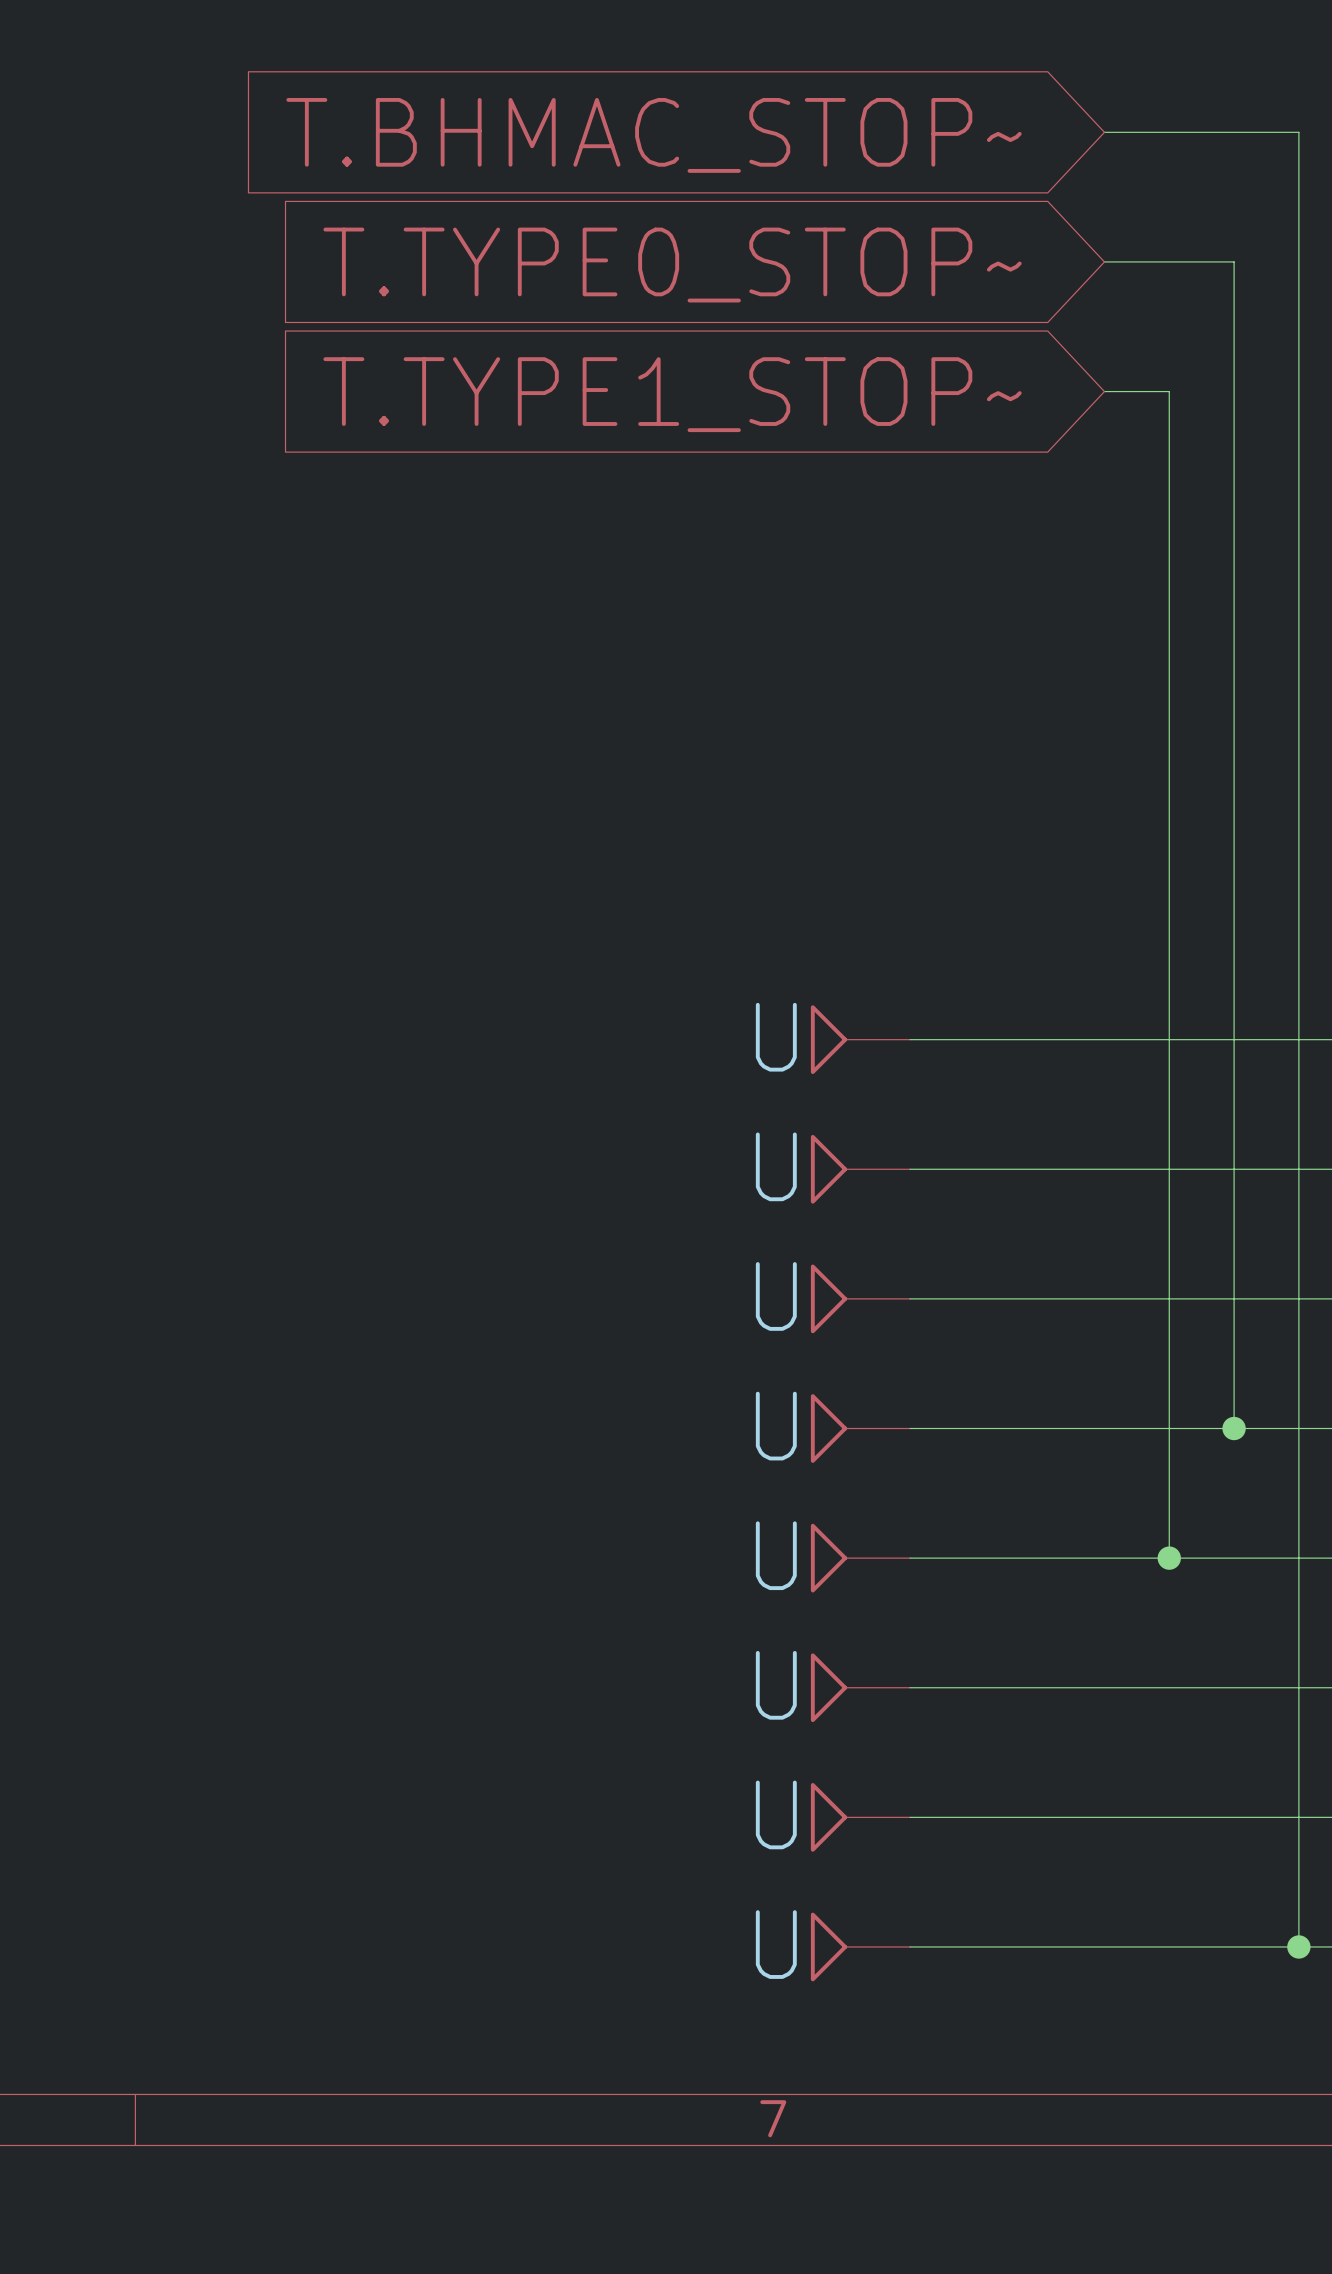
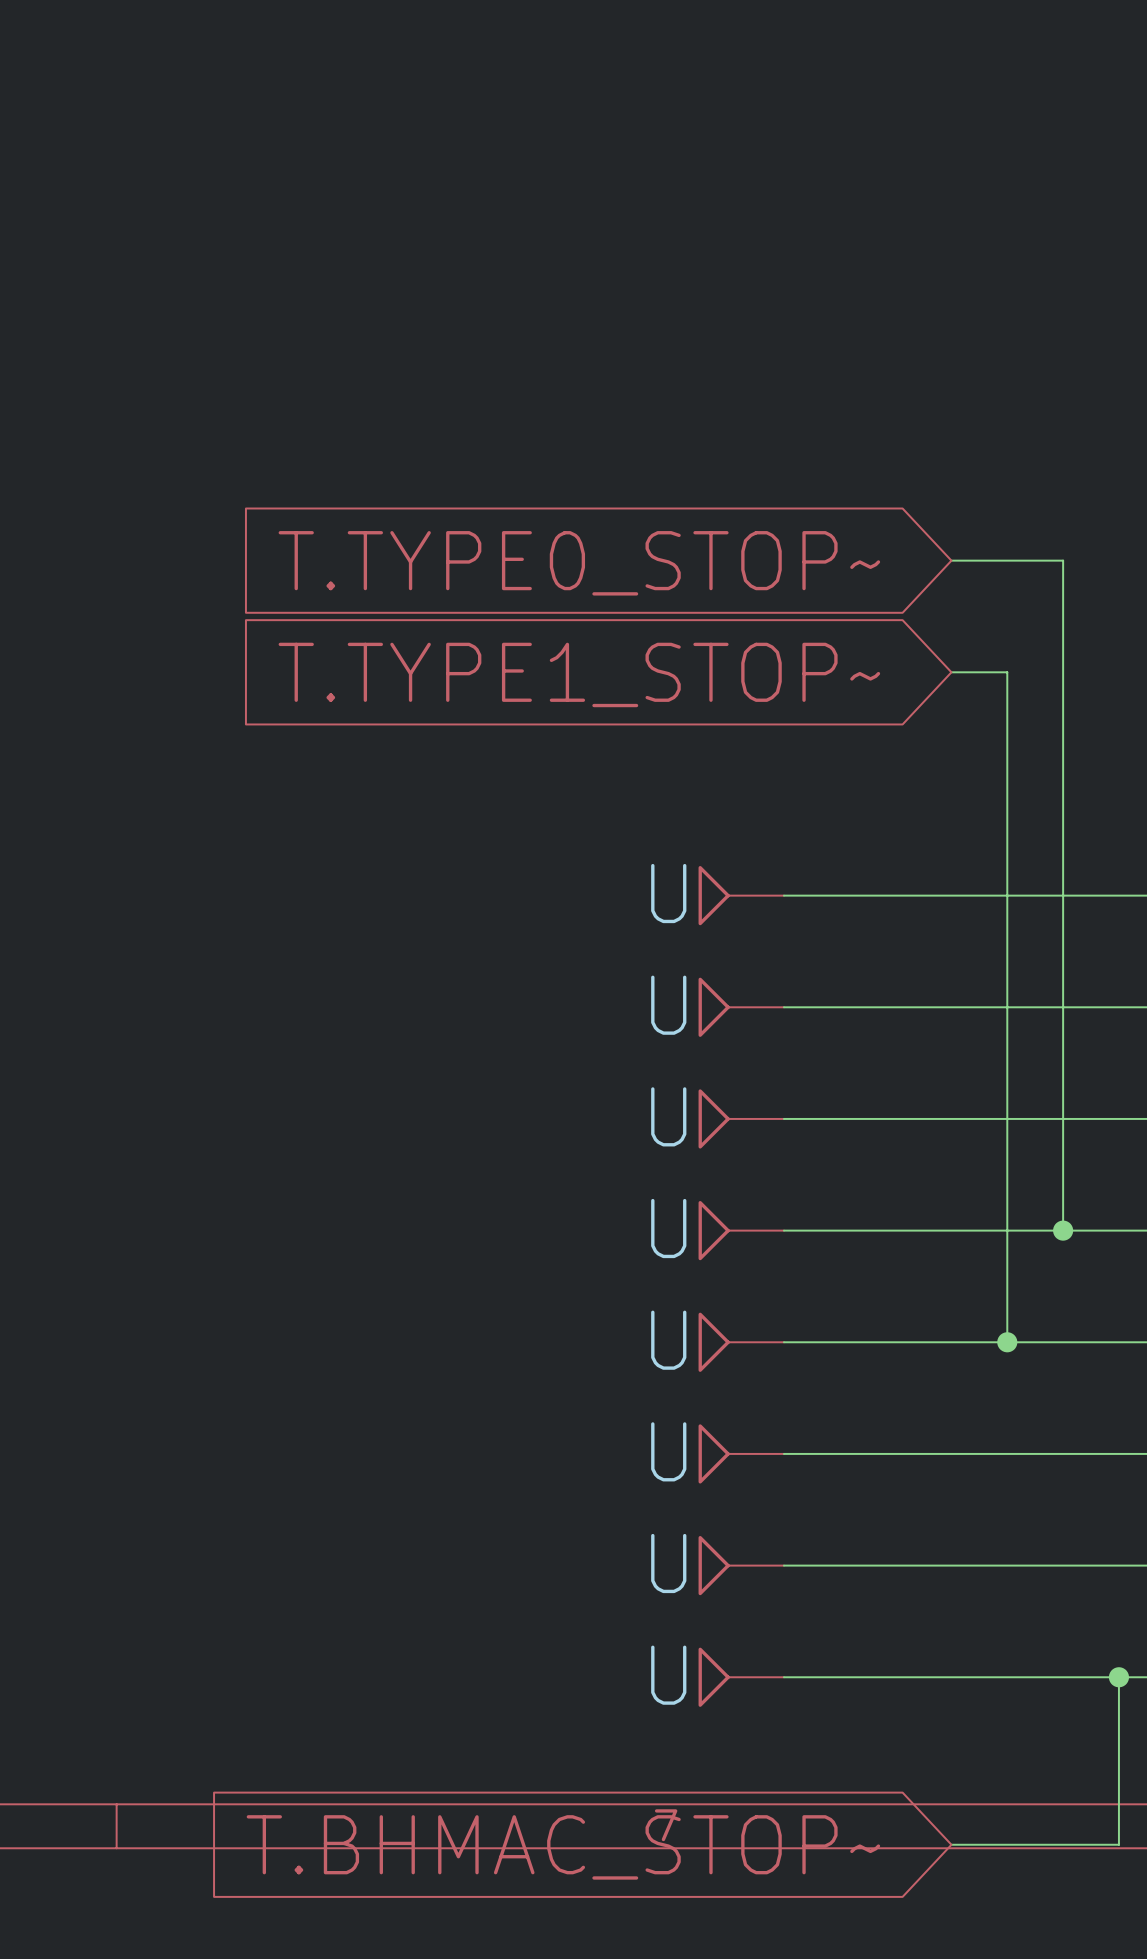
wire: (1104, 132) (1298, 132) (1298, 1946) -> (951, 1844) (1118, 1844) (1118, 1677)
global label: T.BHMAC_STOP~ (654, 135) -> none
wire: (1104, 261) (1234, 261) (1234, 650) -> (951, 560) (1063, 560)
global label position: T.TYPE0_STOP~ (672, 265) -> T.TYPE0_STOP~ (579, 563)
wire: (1104, 391) (1169, 391) (1169, 780) -> (951, 672) (1007, 672)
global label position: T.TYPE1_STOP~ (672, 394) -> T.TYPE1_STOP~ (579, 674)
global label: none -> T.BHMAC_STOP~ (563, 1847)

